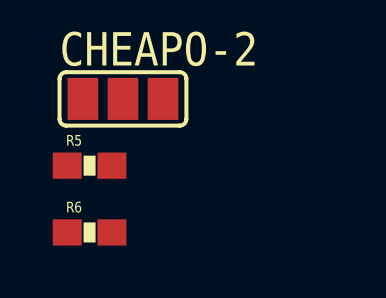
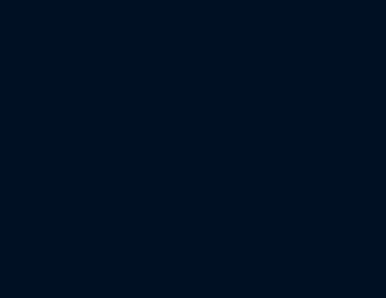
CHEAPO-2: (122, 98) -> none
R5: (89, 165) -> none
R6: (89, 232) -> none

